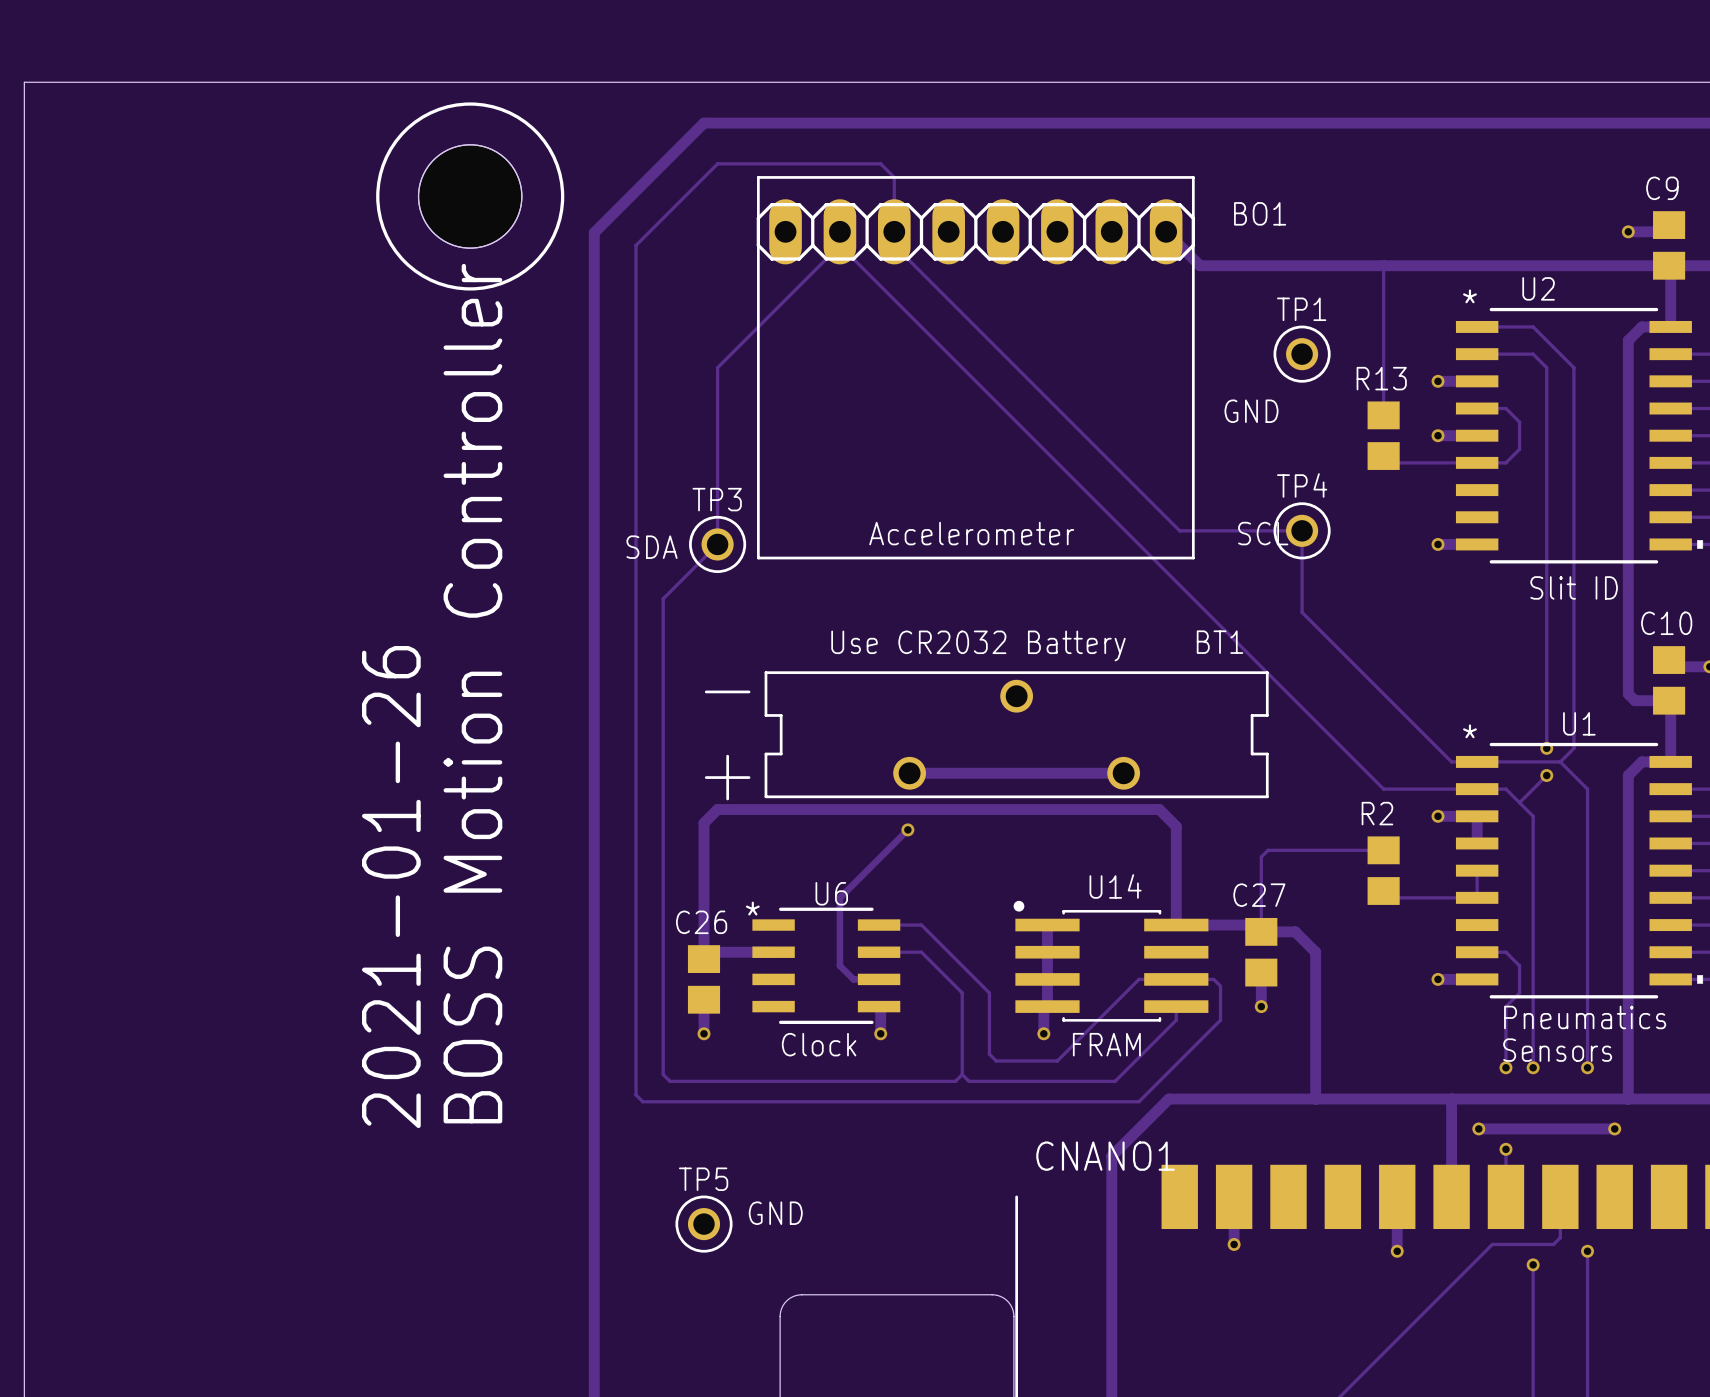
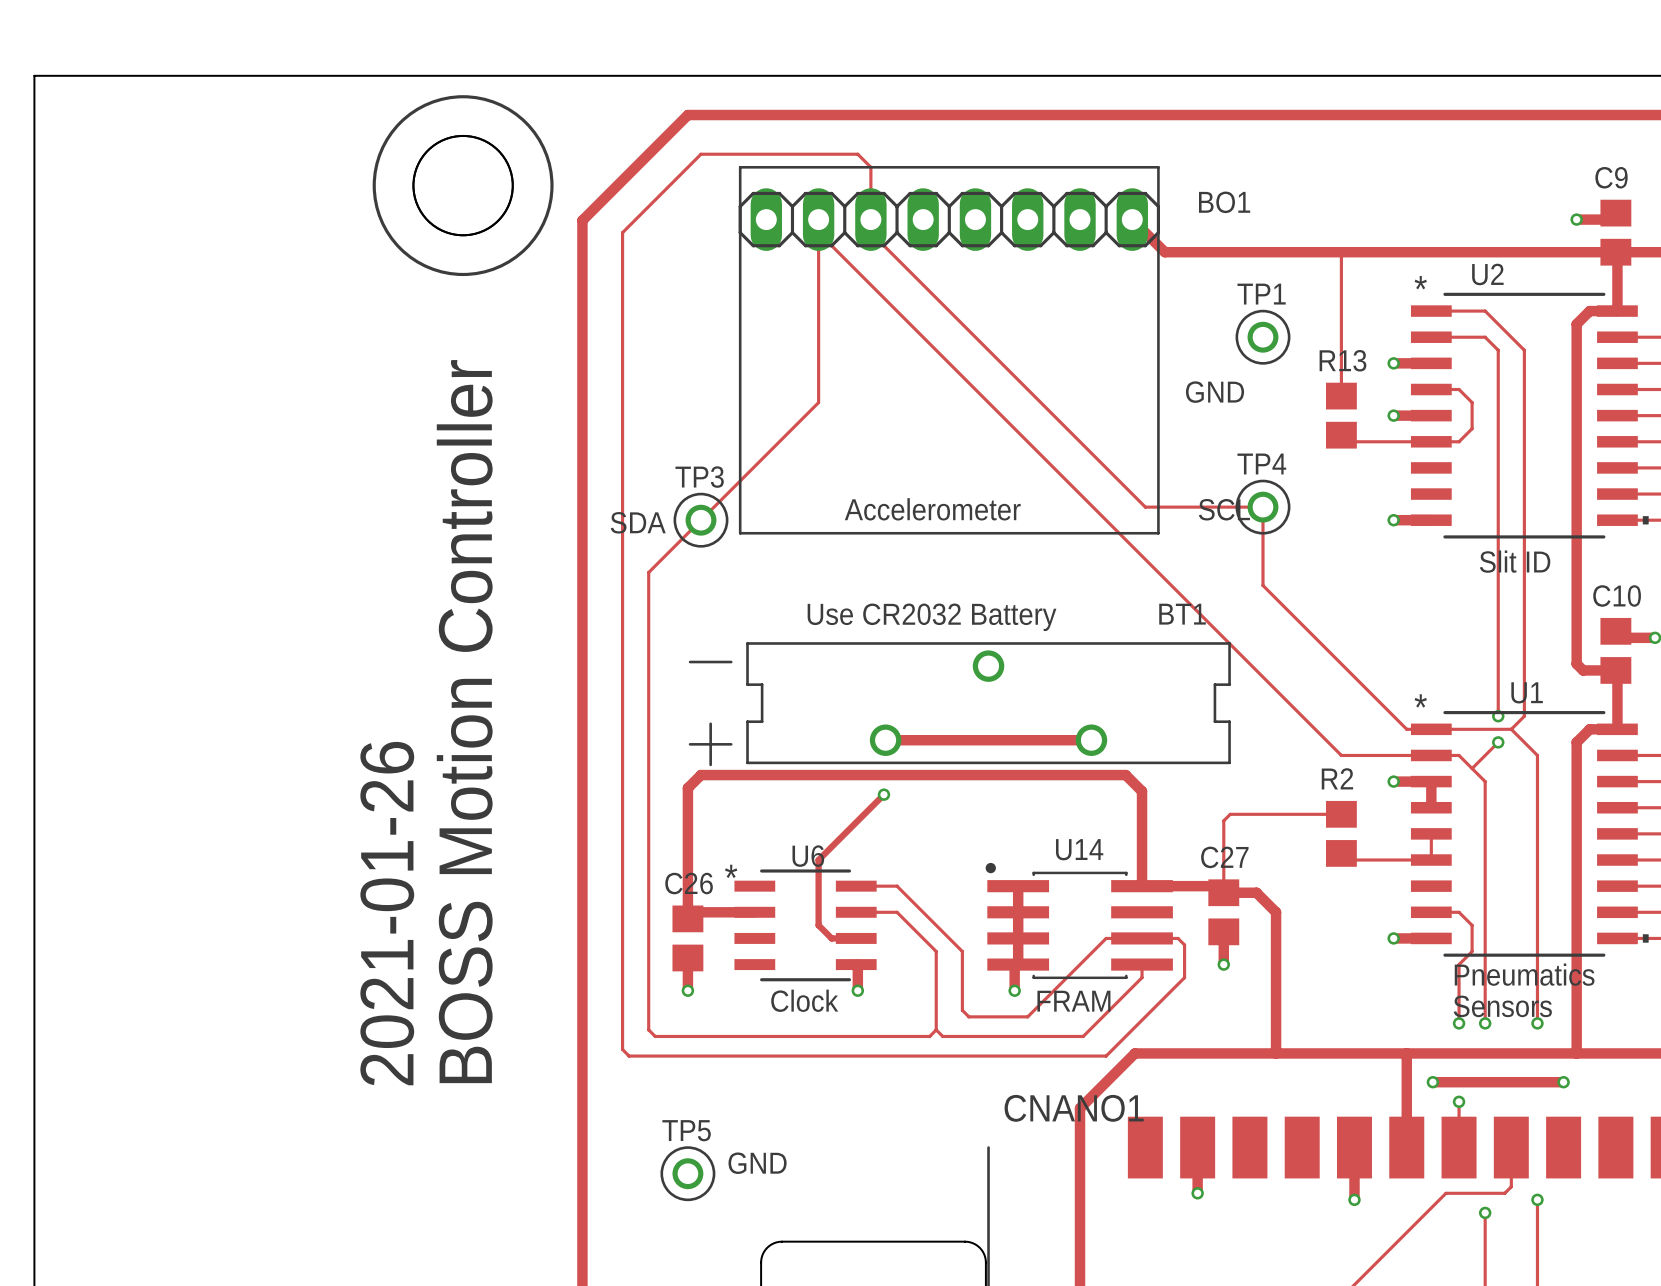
track: (839, 245) (717, 367) (717, 544) -> (818, 232) (818, 402) (700, 520)

